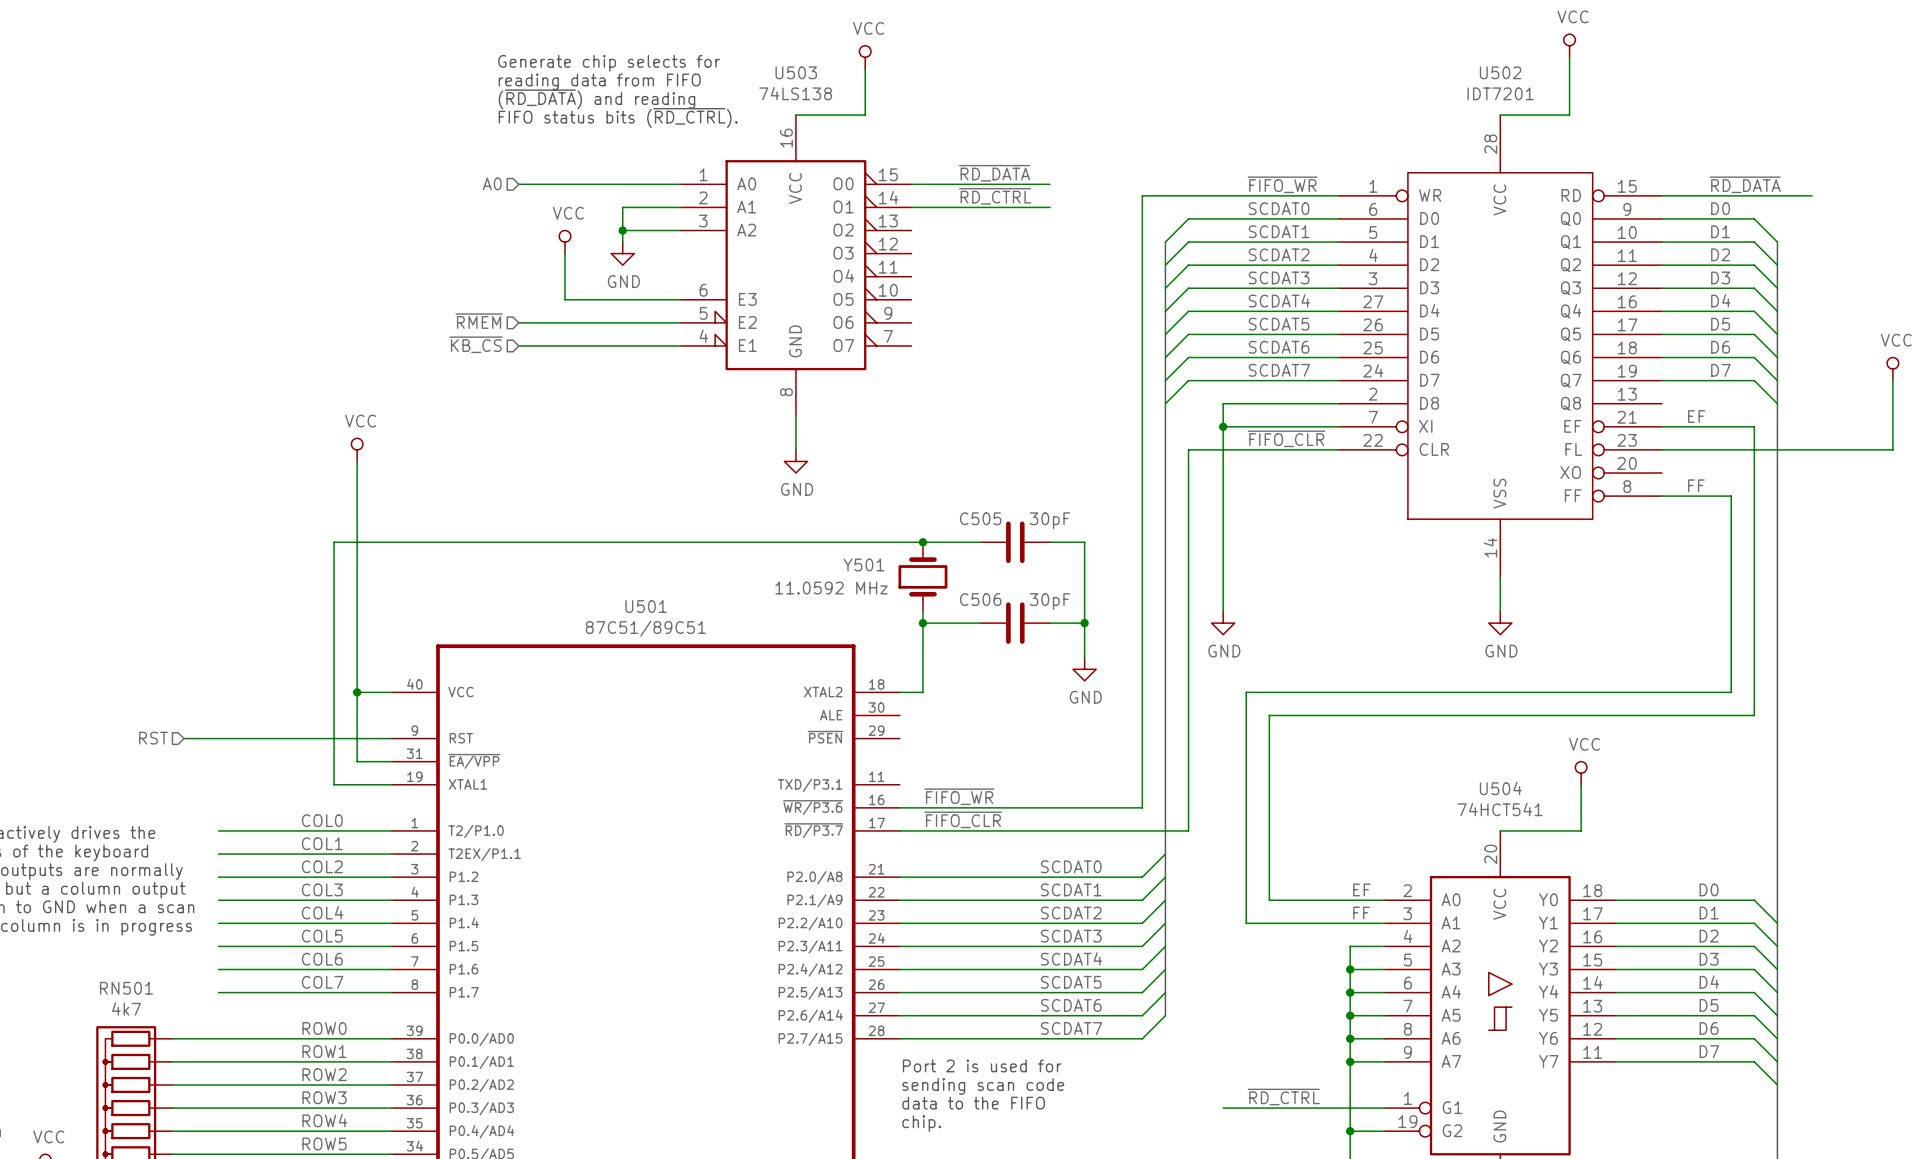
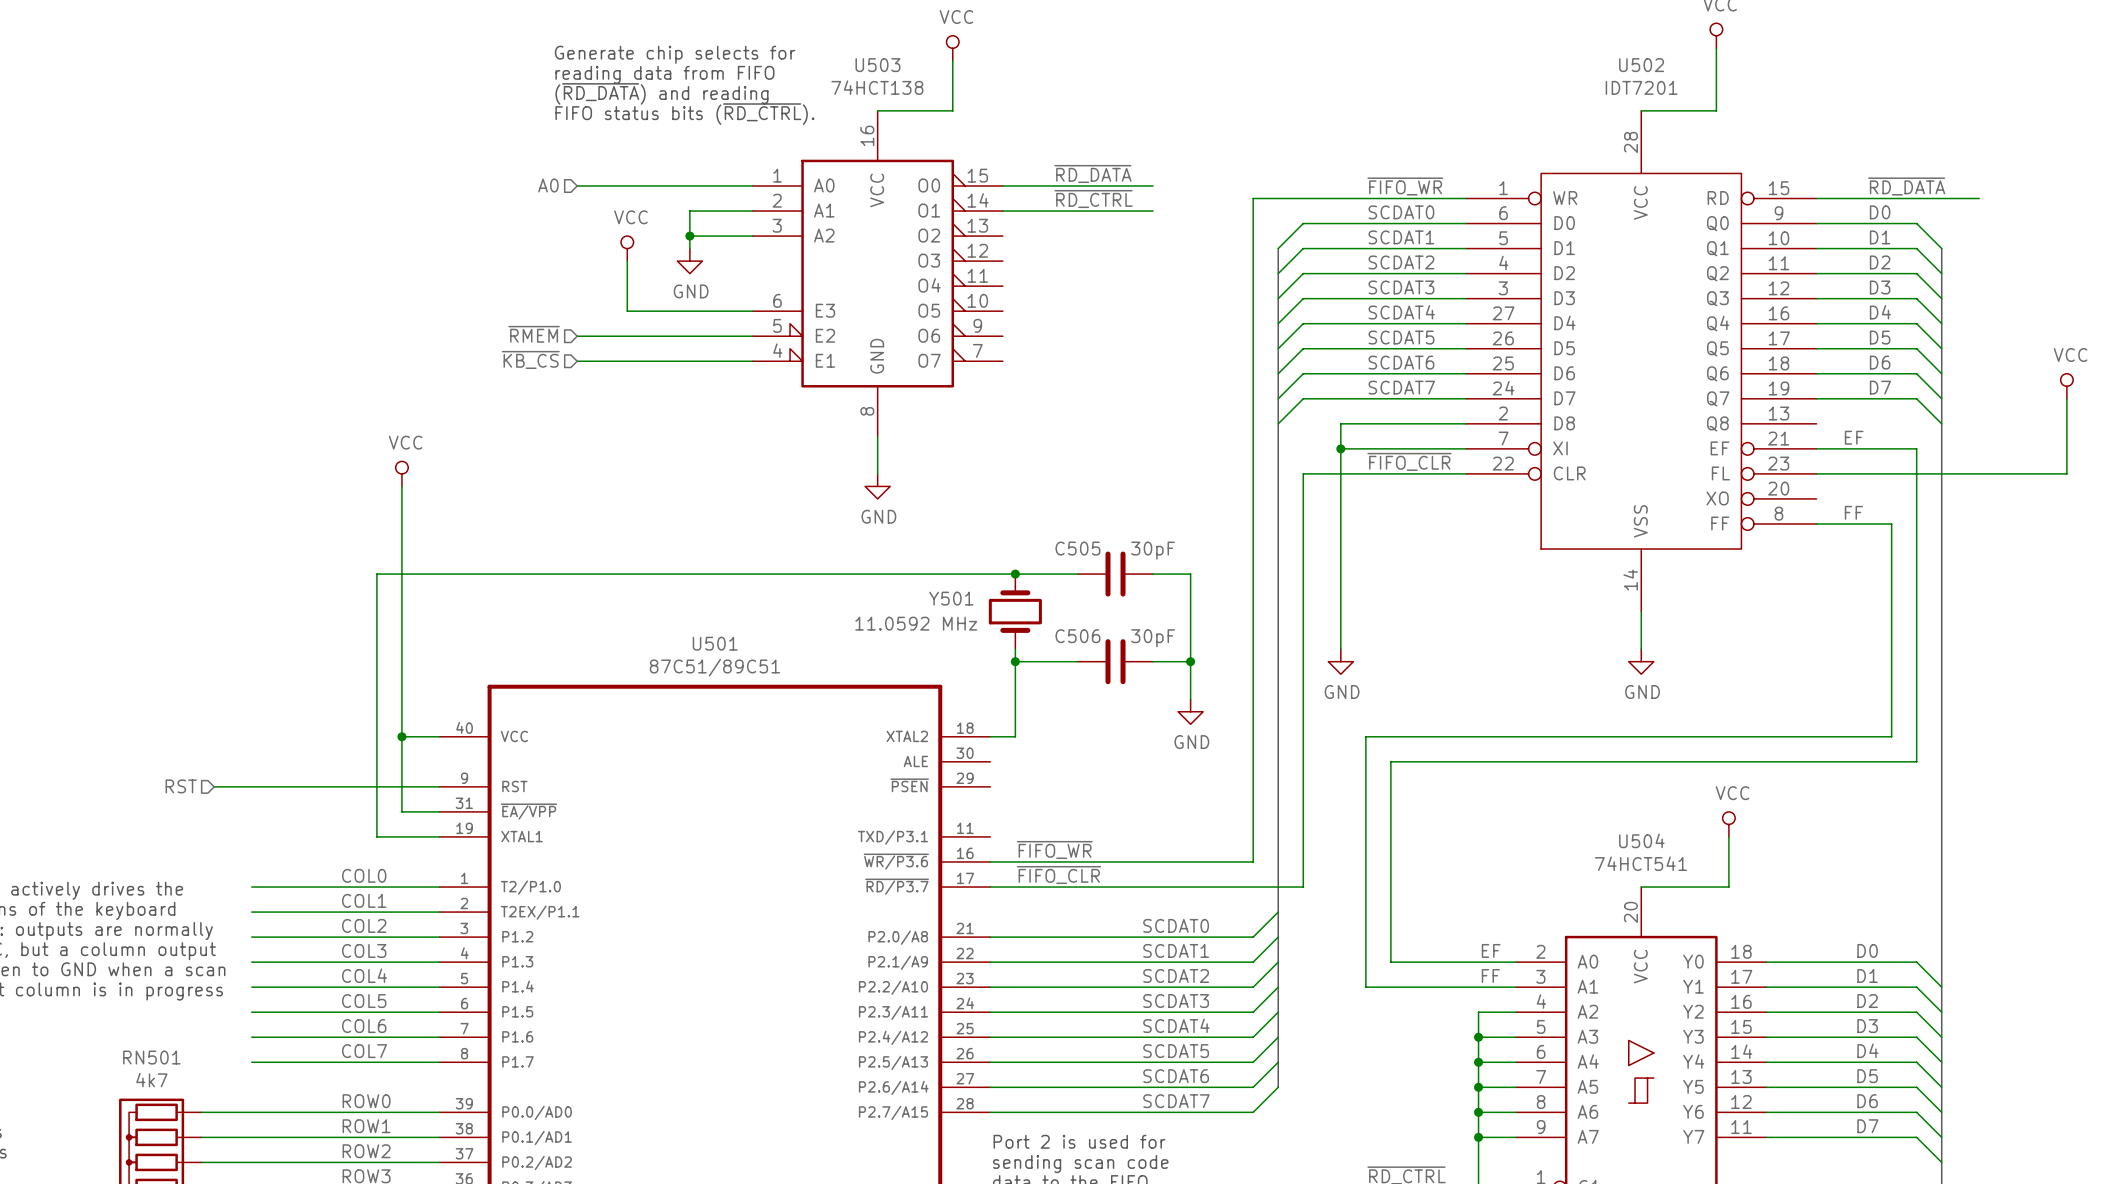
U503 value: 74LS138 (795, 93) -> 74HCT138 (877, 87)

